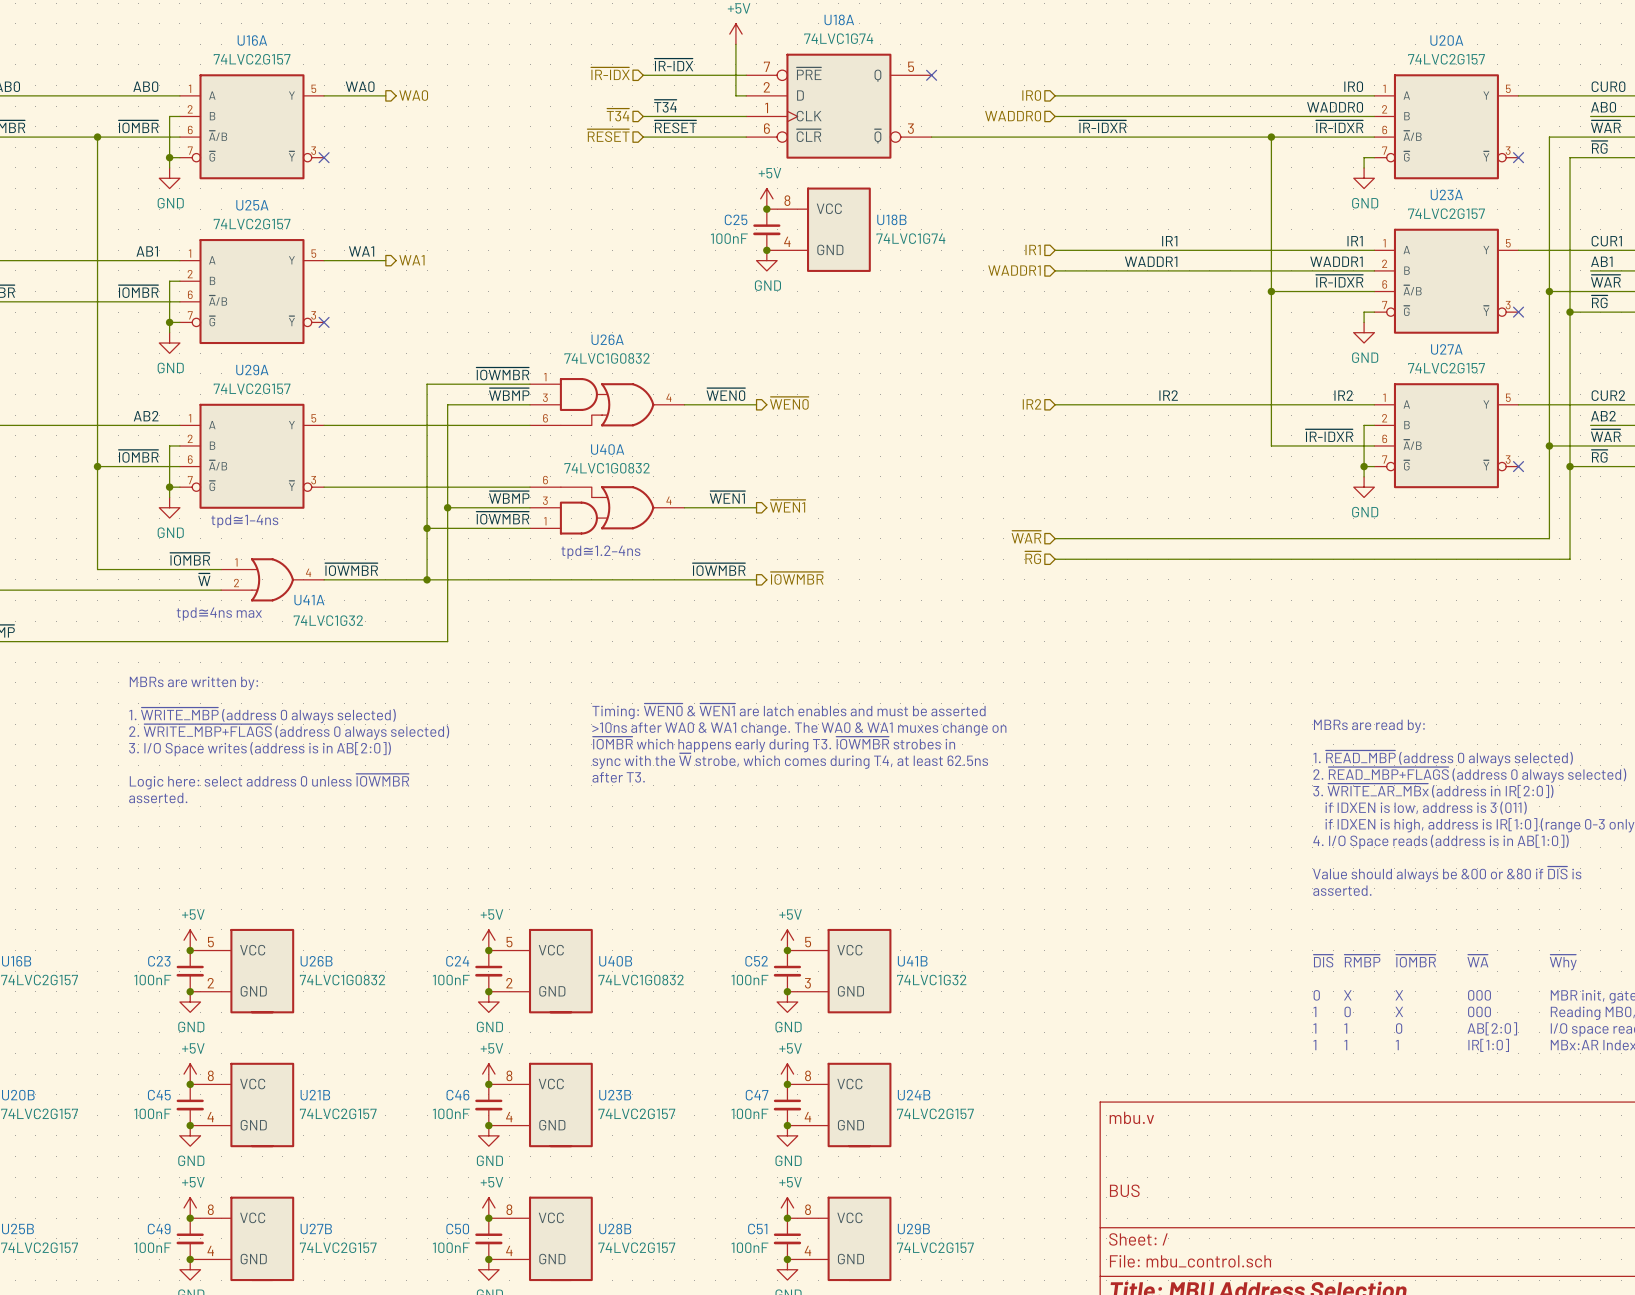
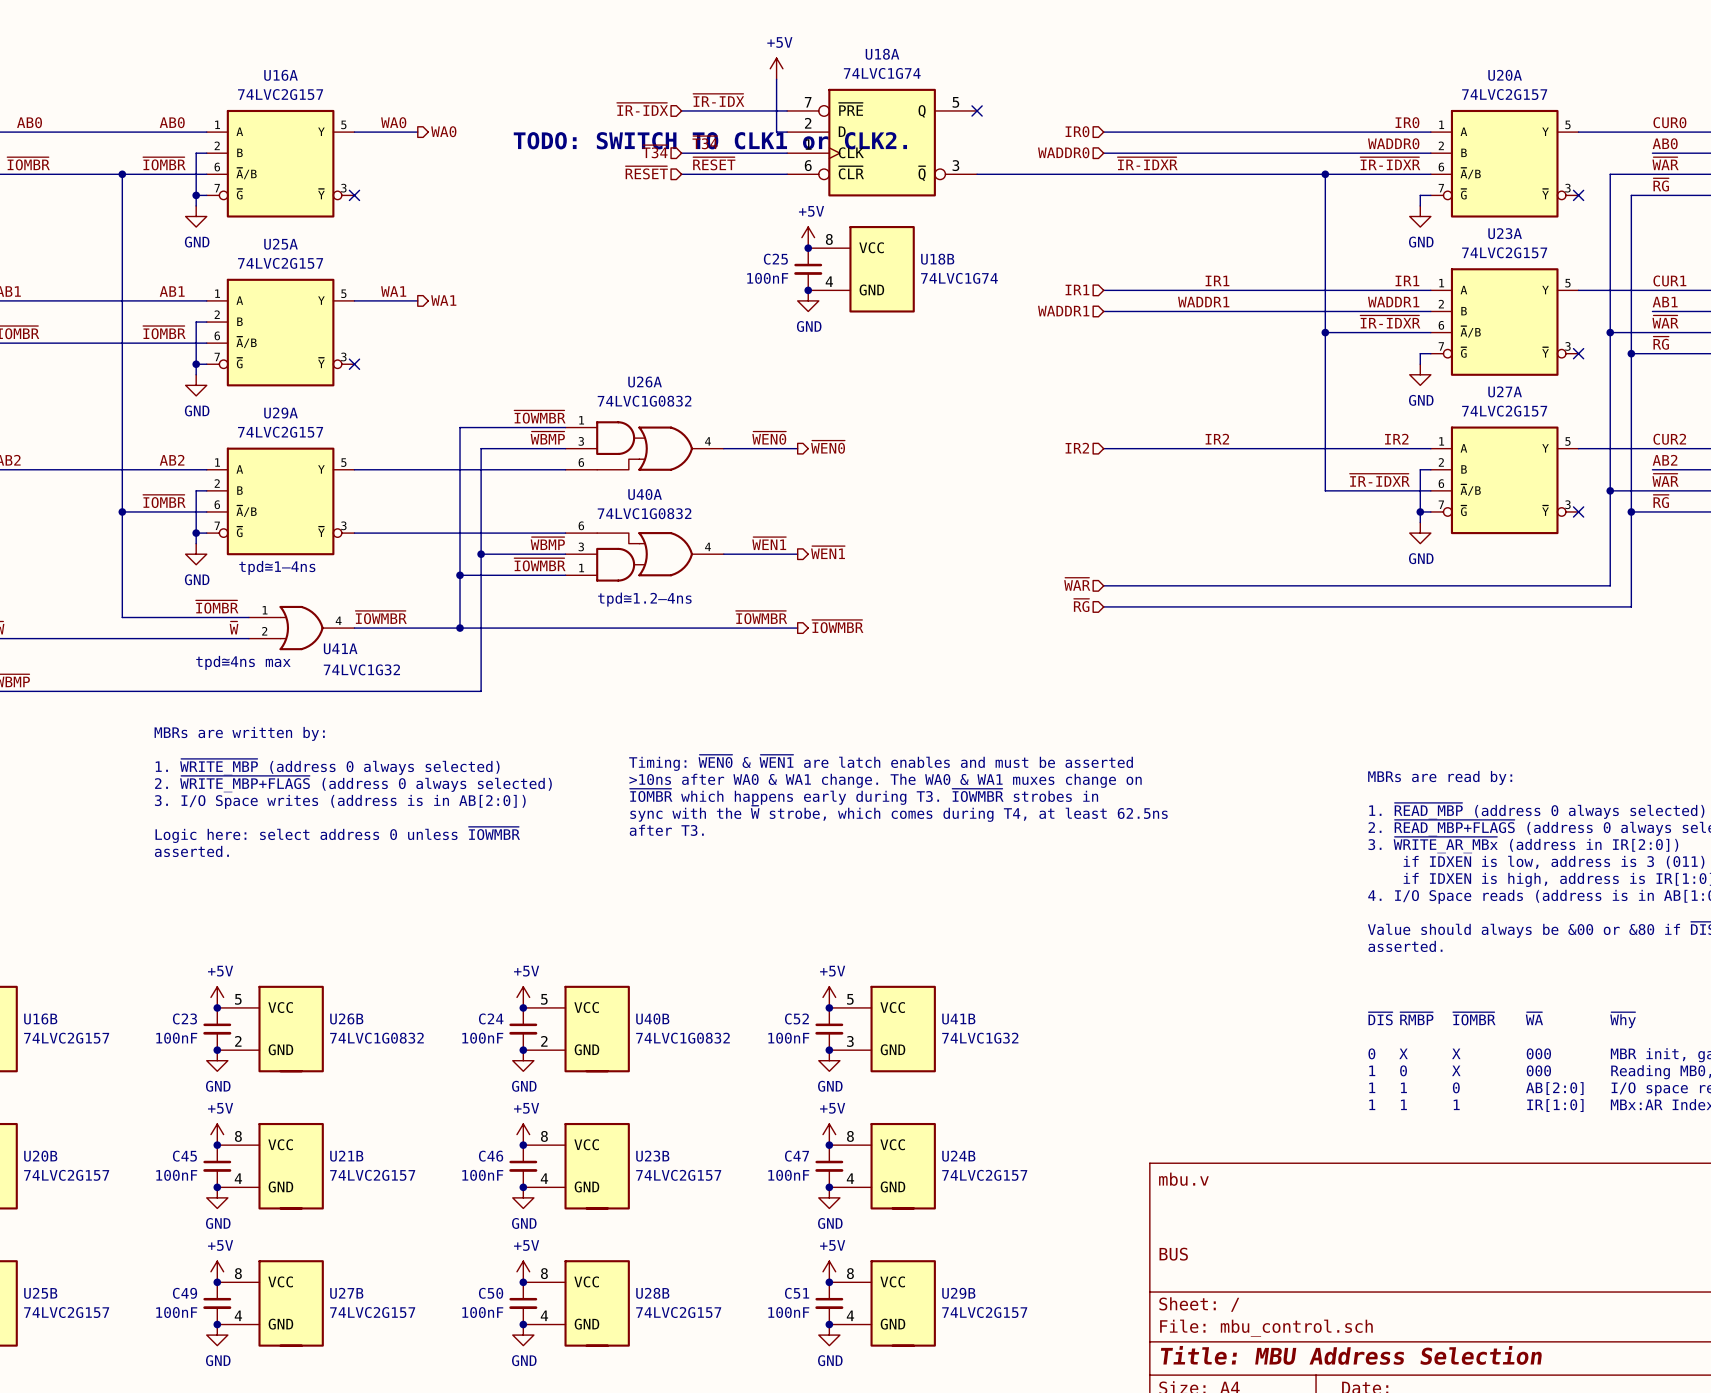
text: none -> TODO: SWITCH TO CLK1 or CLK2. (710, 140)

